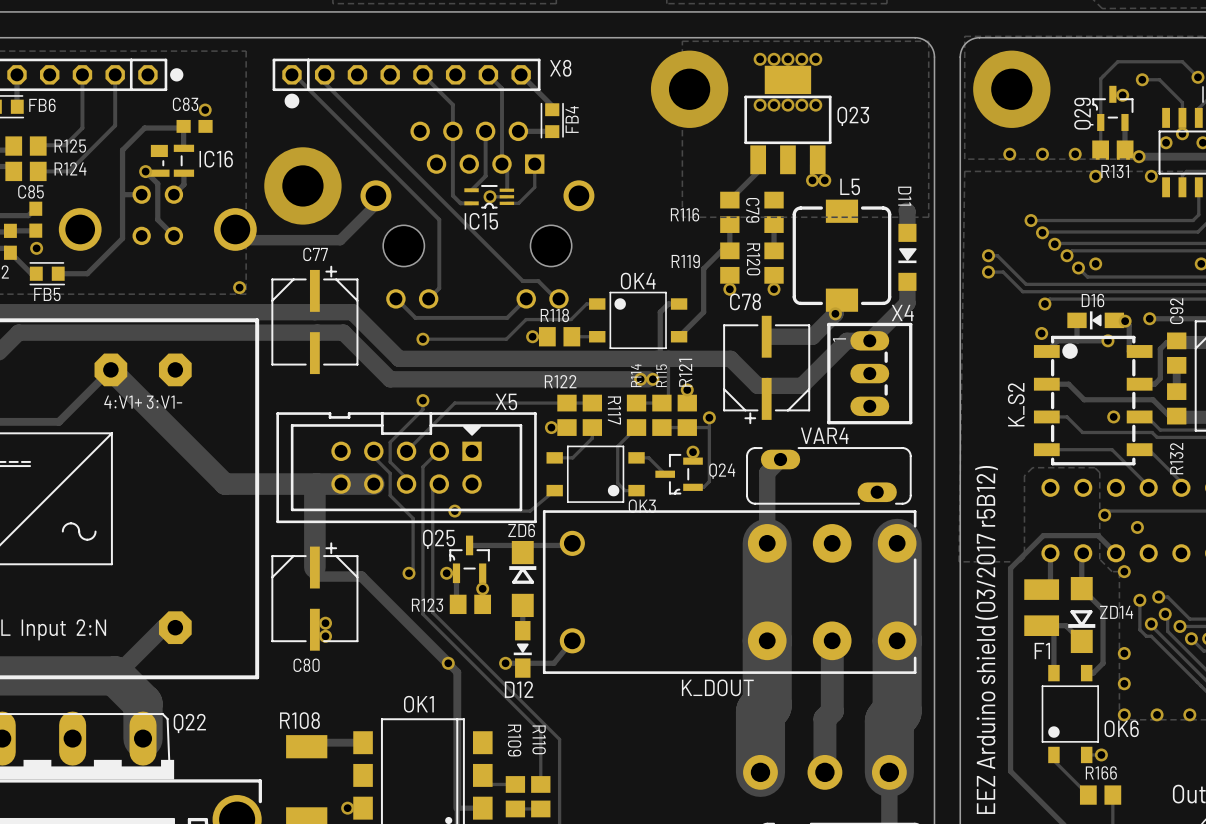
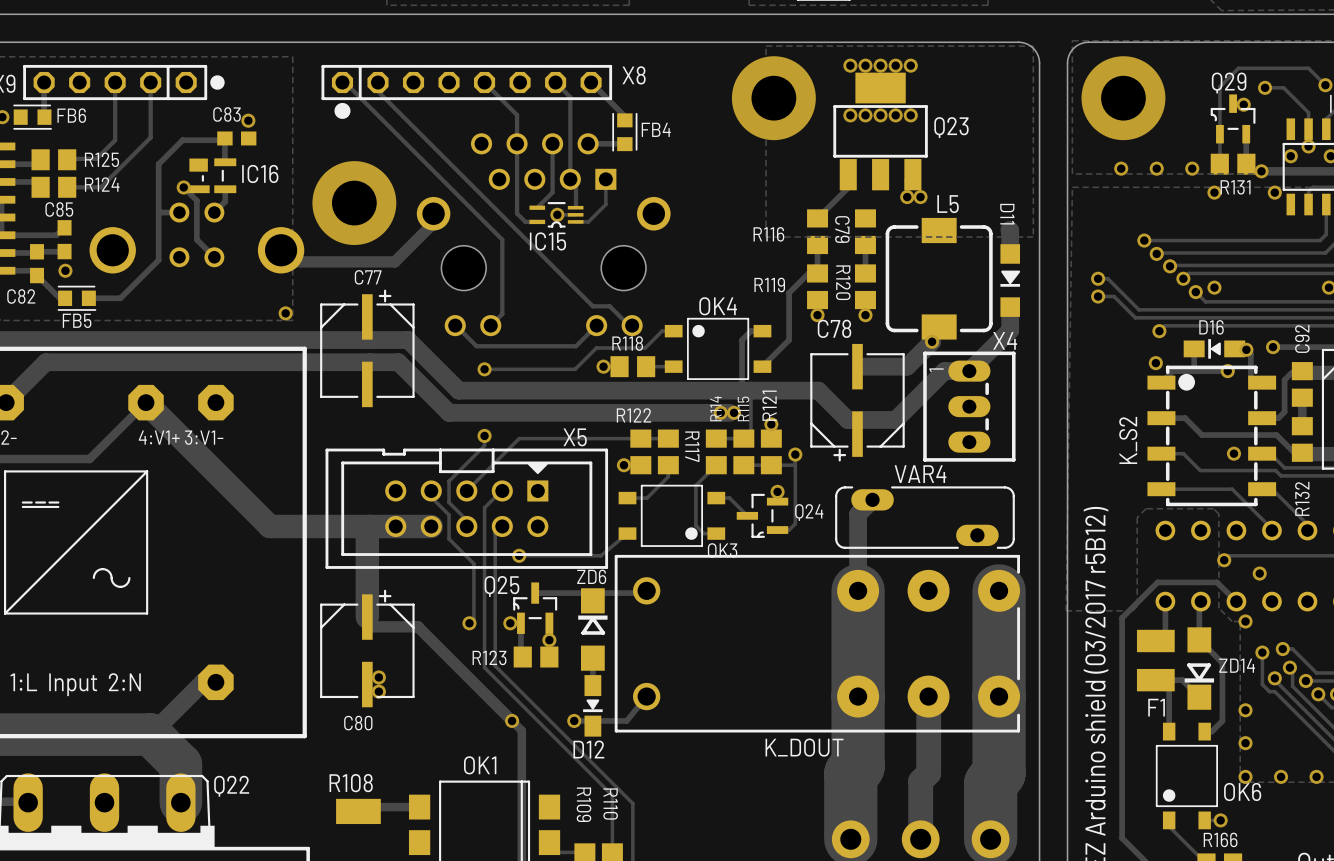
Q29 name rotation: 0° (1083, 113) -> 90° clockwise (1229, 82)
FB4 name rotation: 0° (572, 119) -> 90° clockwise (656, 129)

